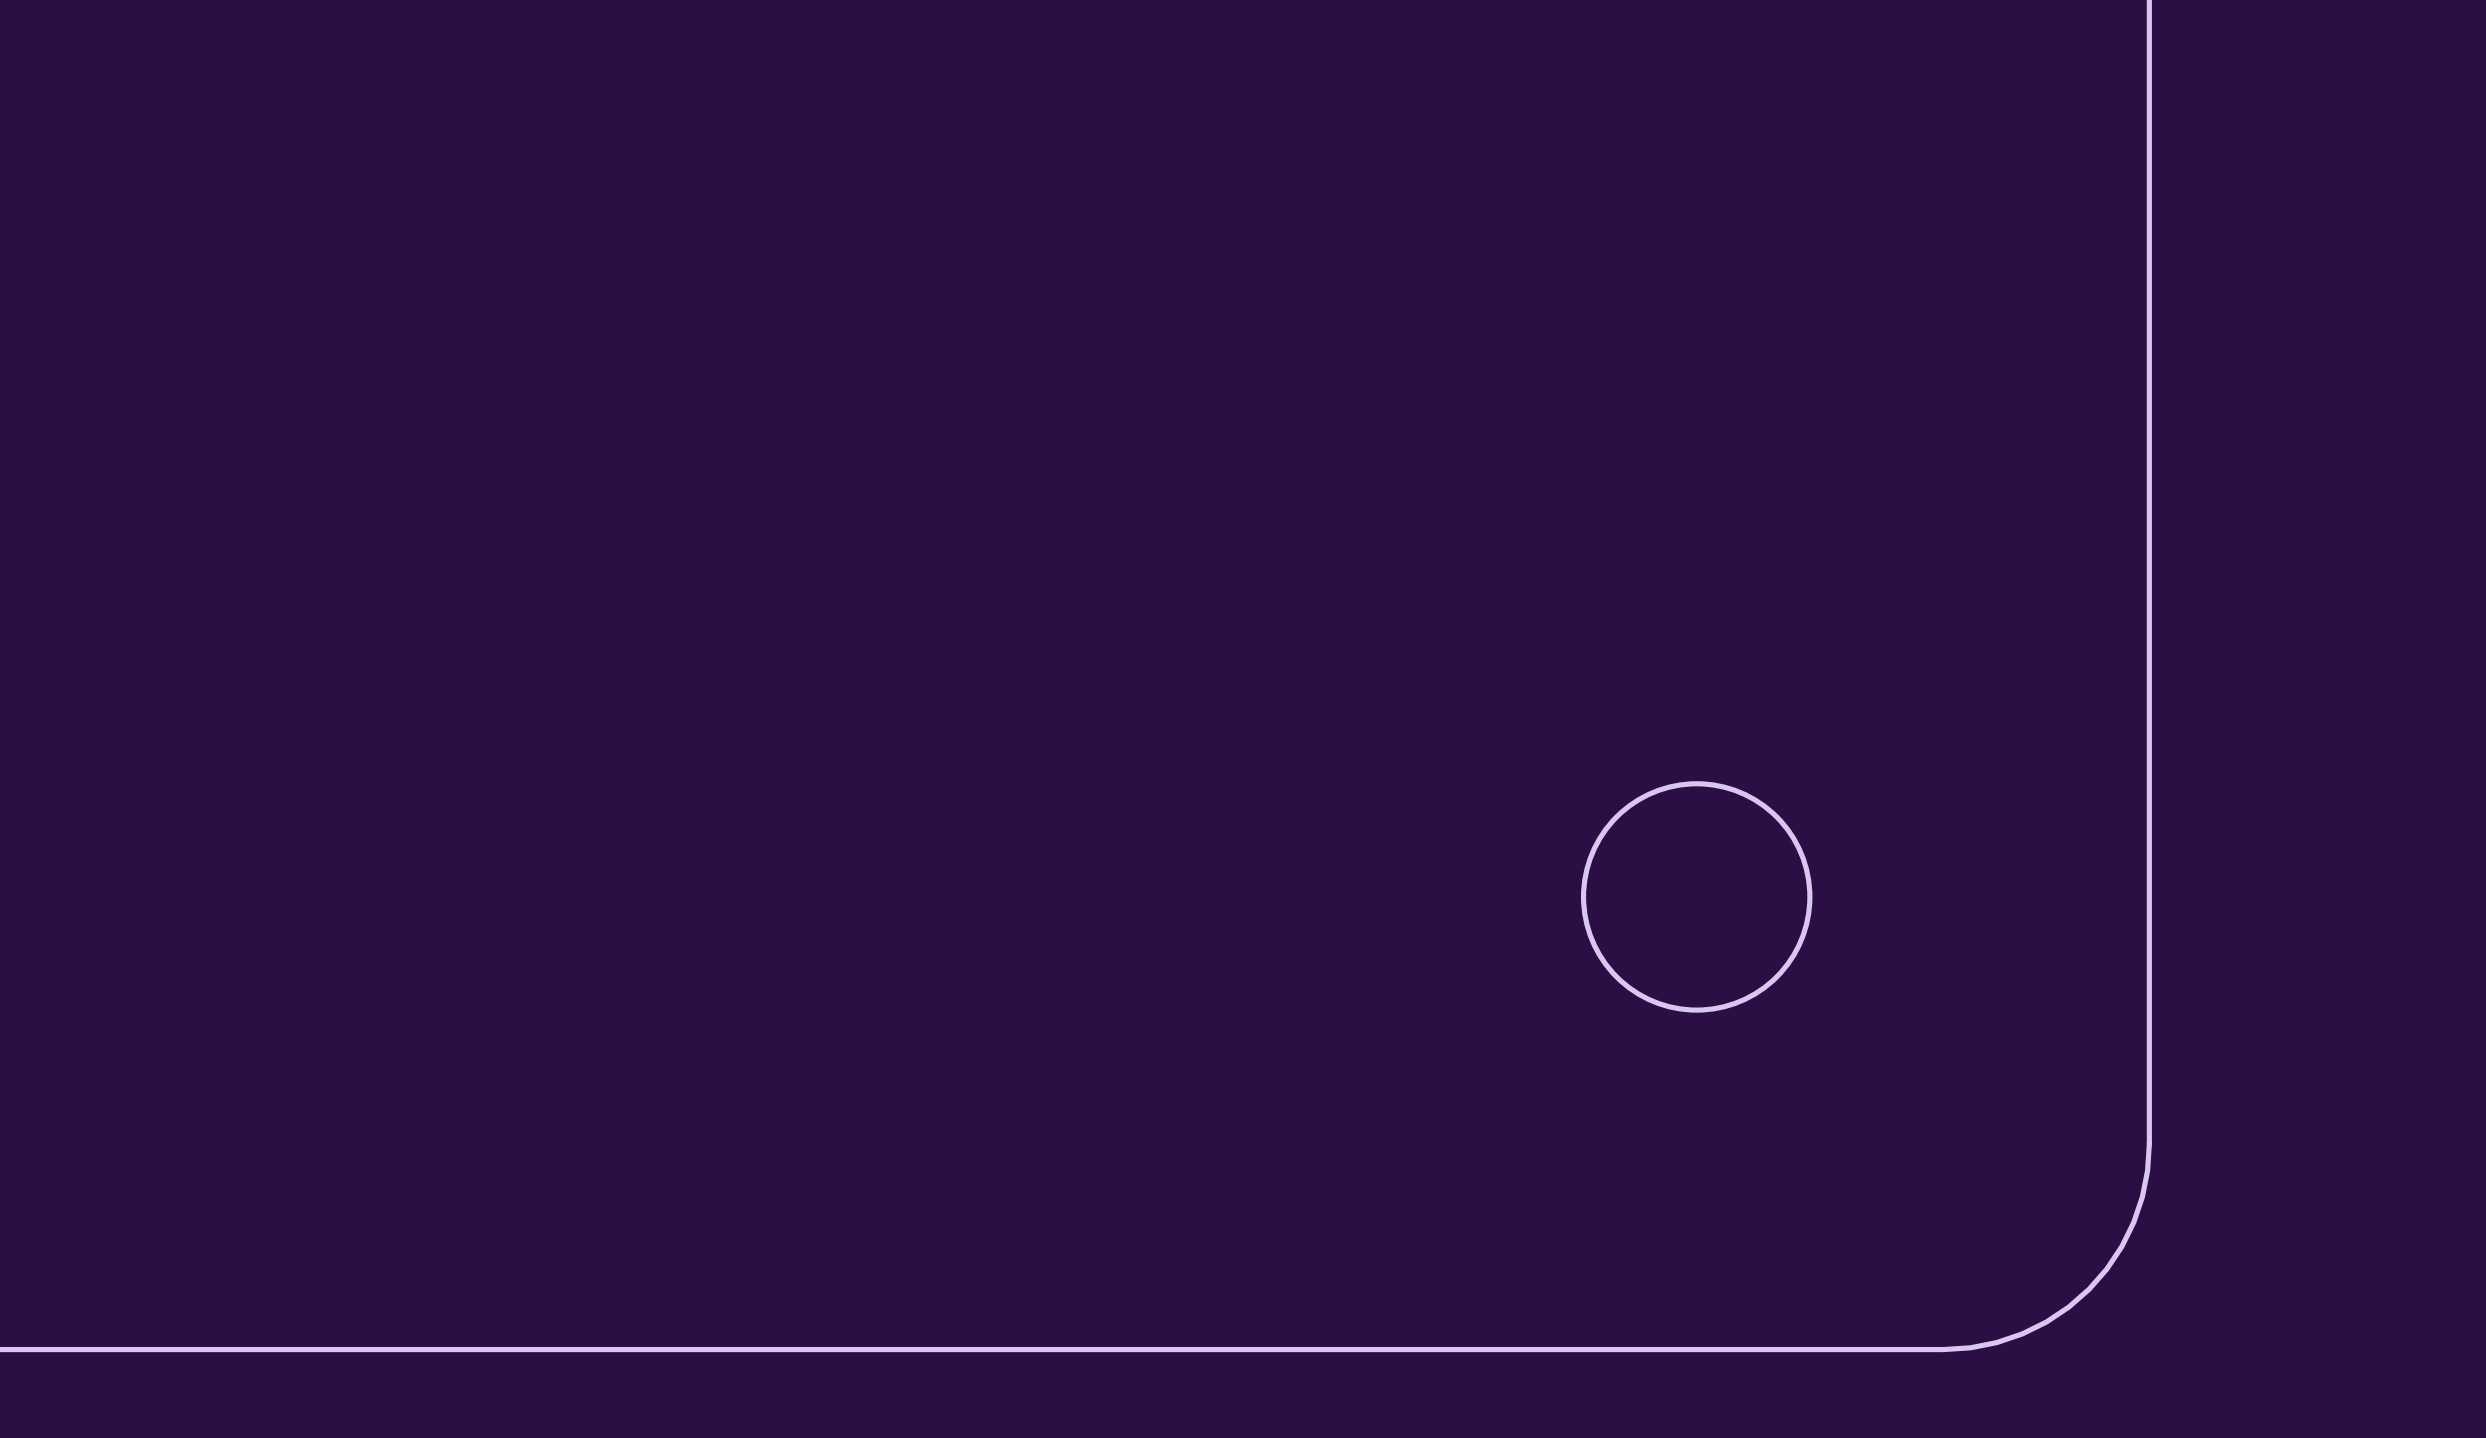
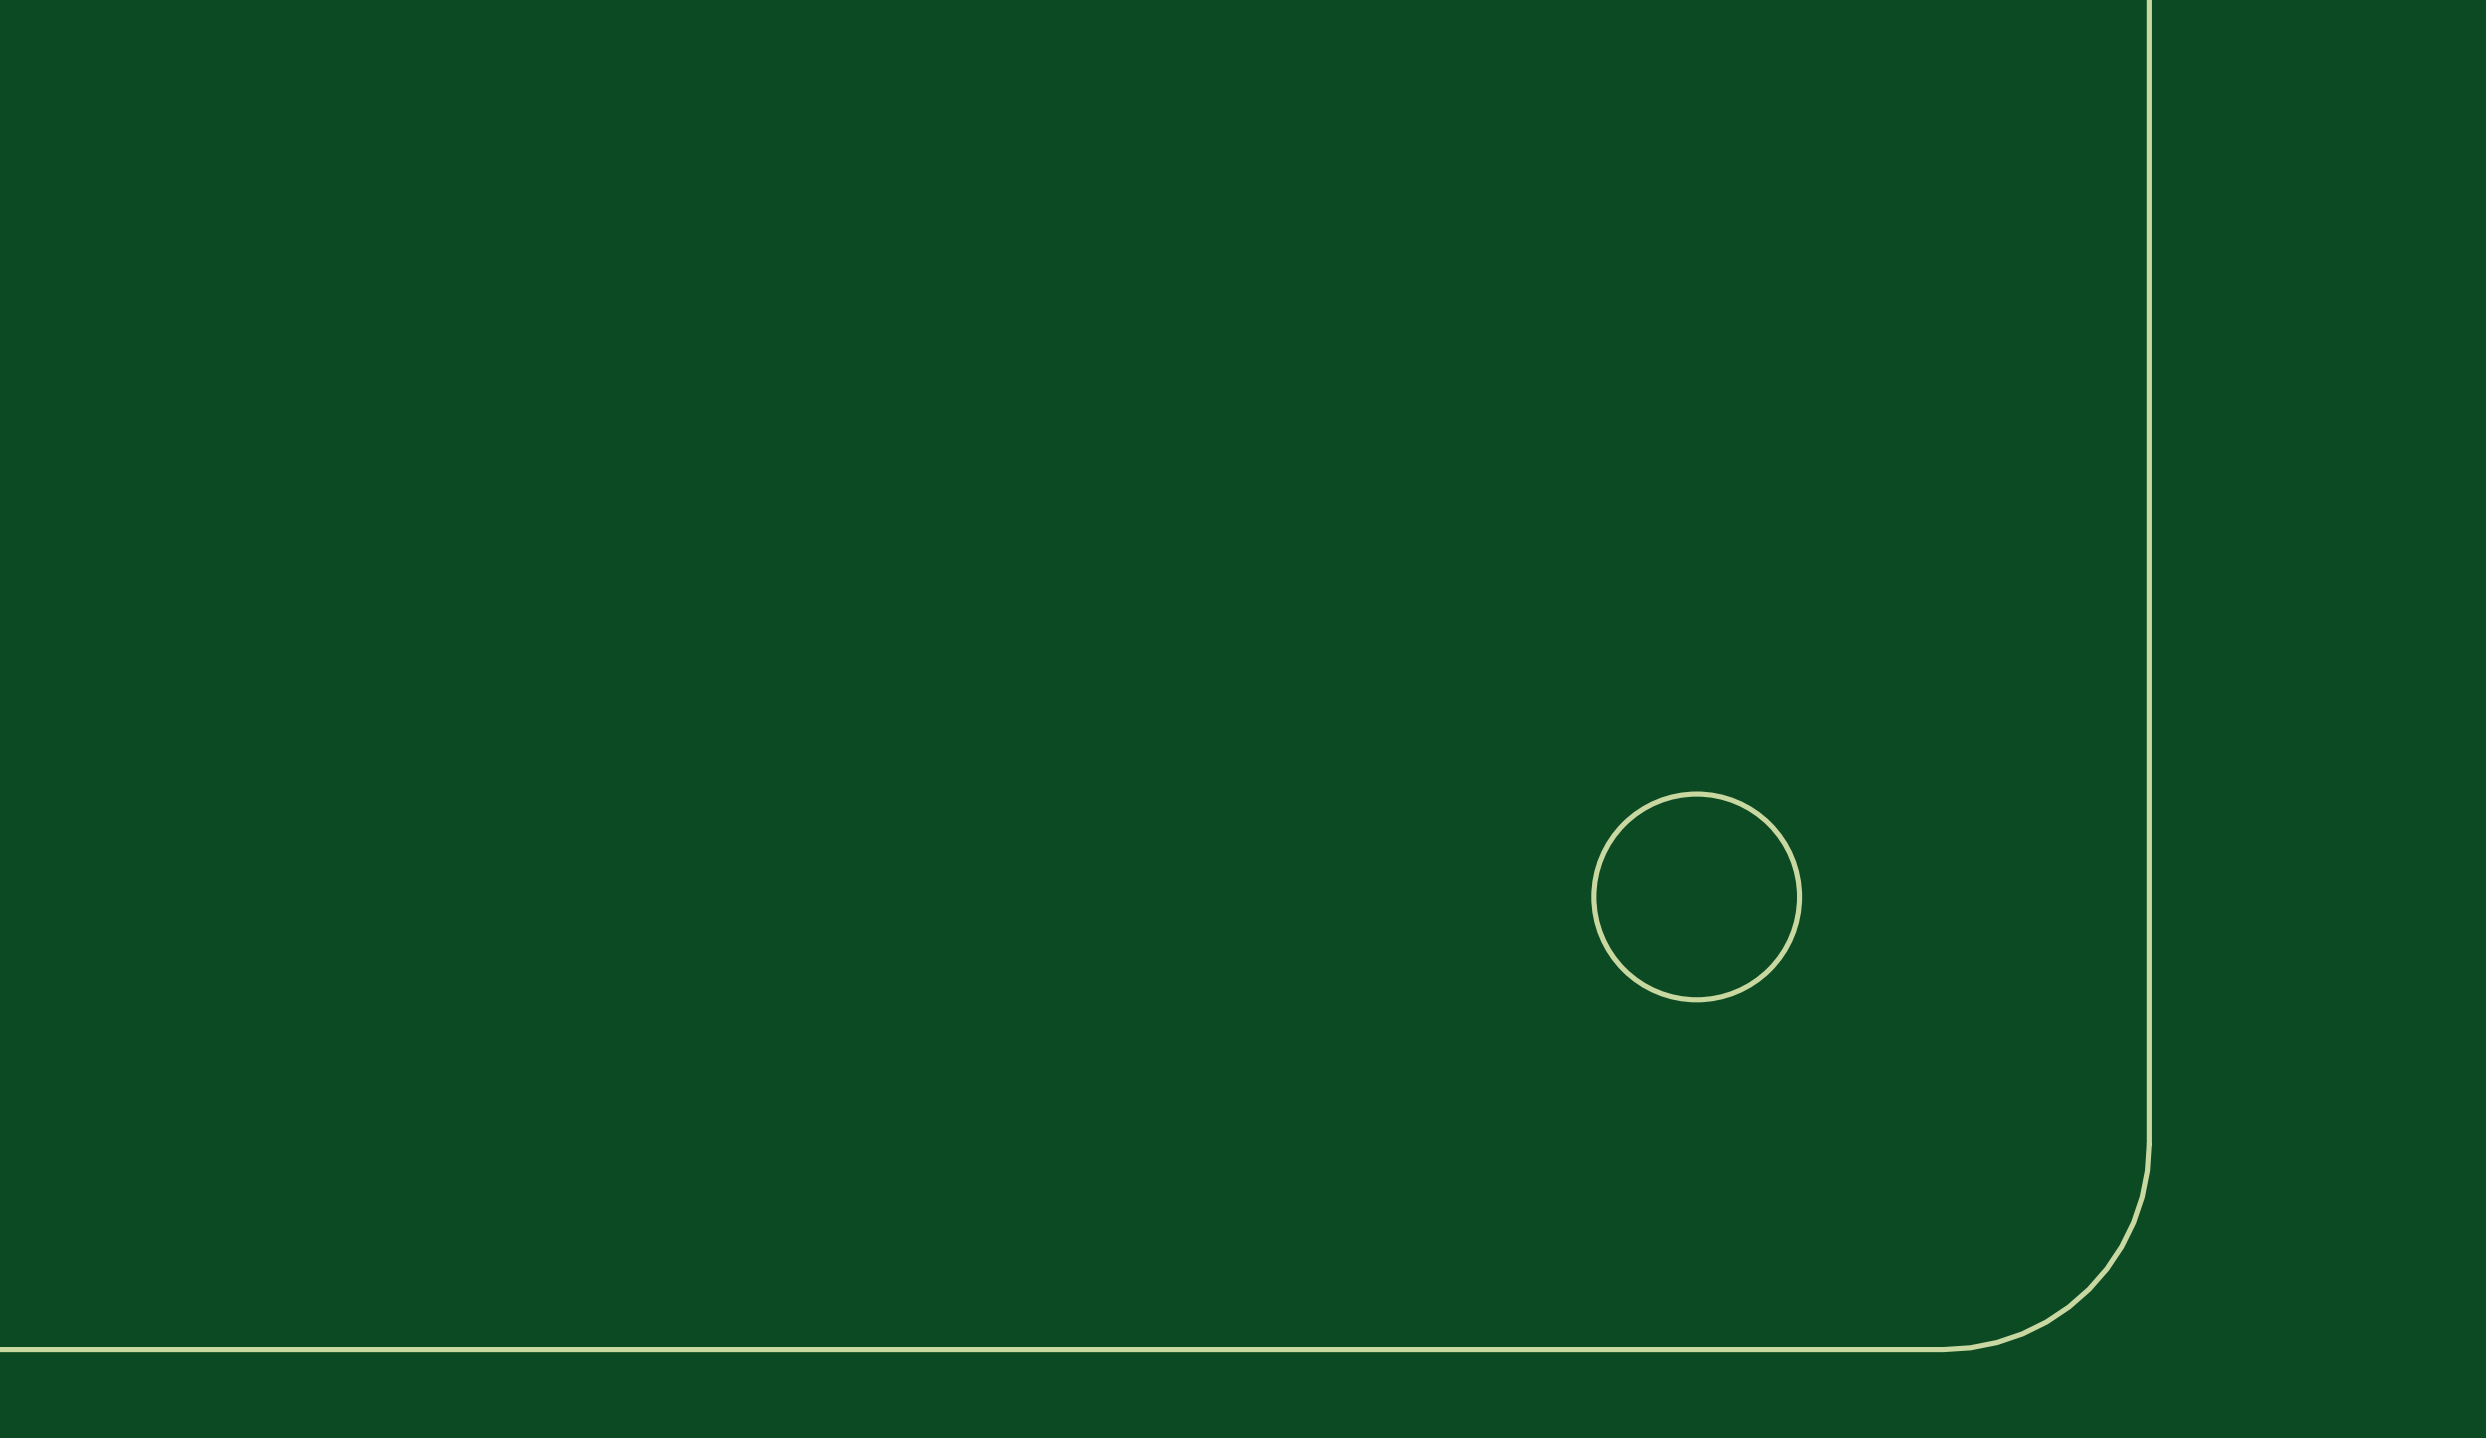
round board edge size: [1580, 781, 1813, 1013] -> [1591, 791, 1803, 1003]

